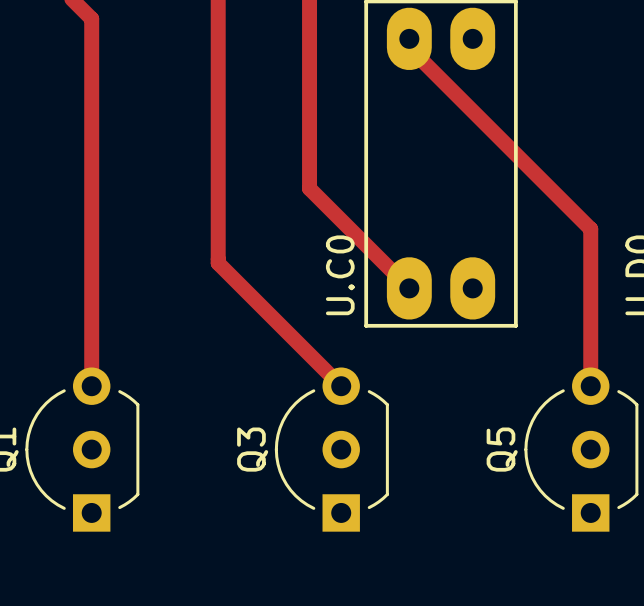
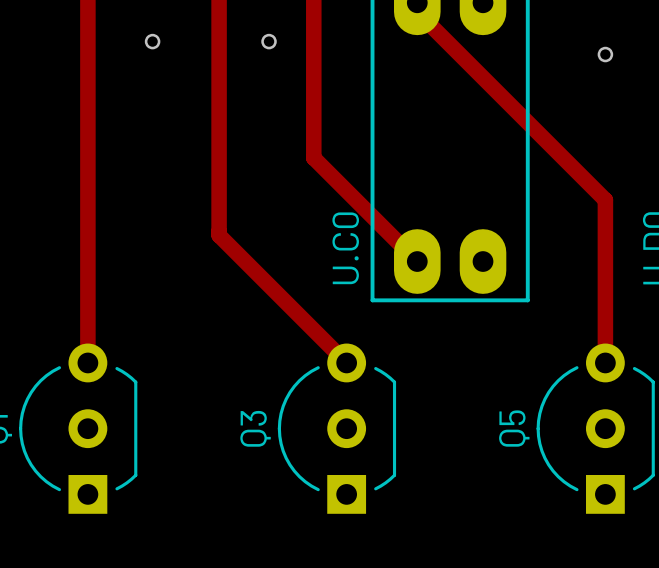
via: none -> (152, 41)
via: none -> (269, 41)
via: none -> (605, 54)

